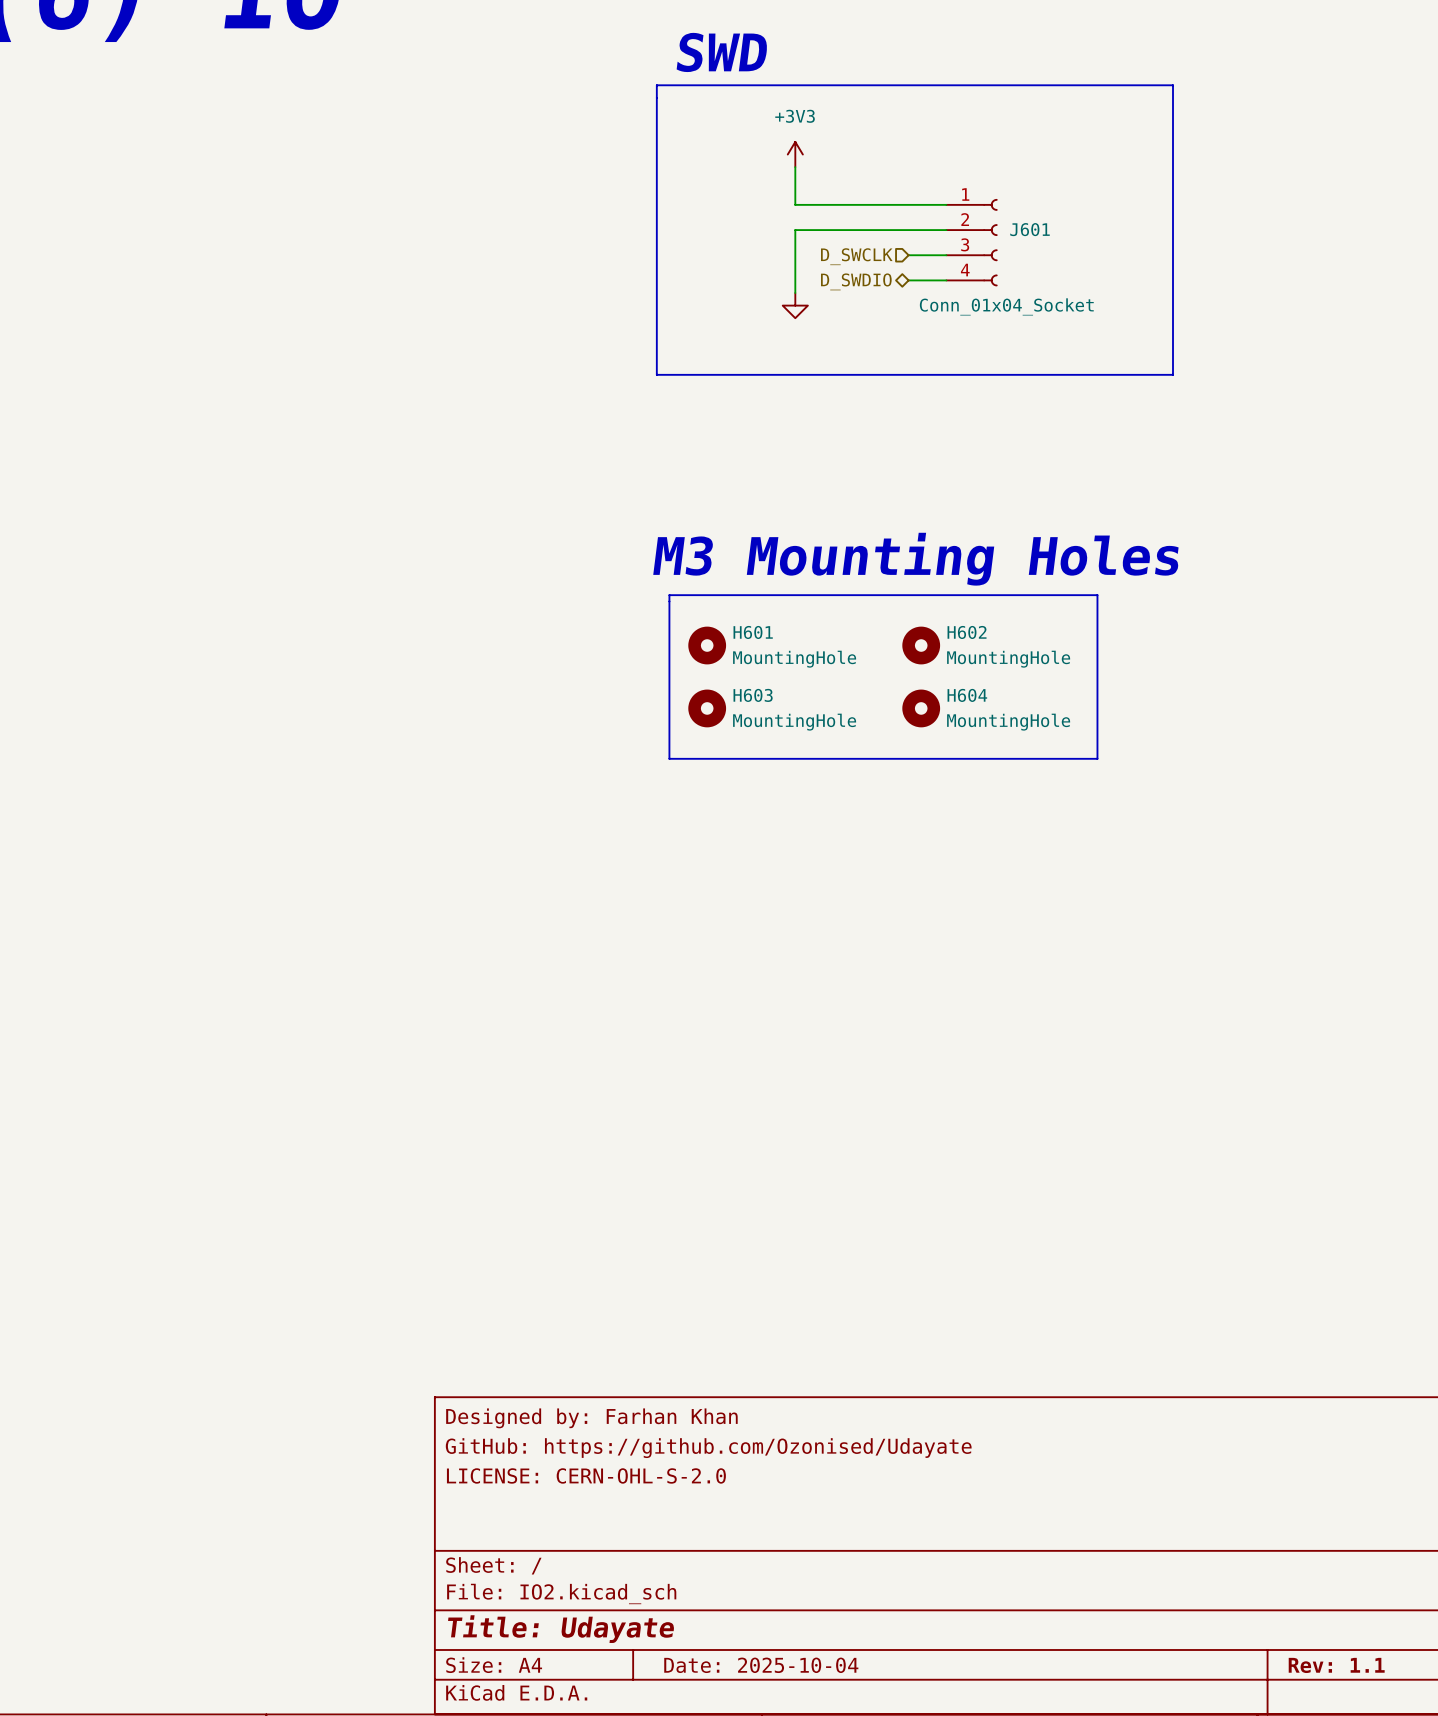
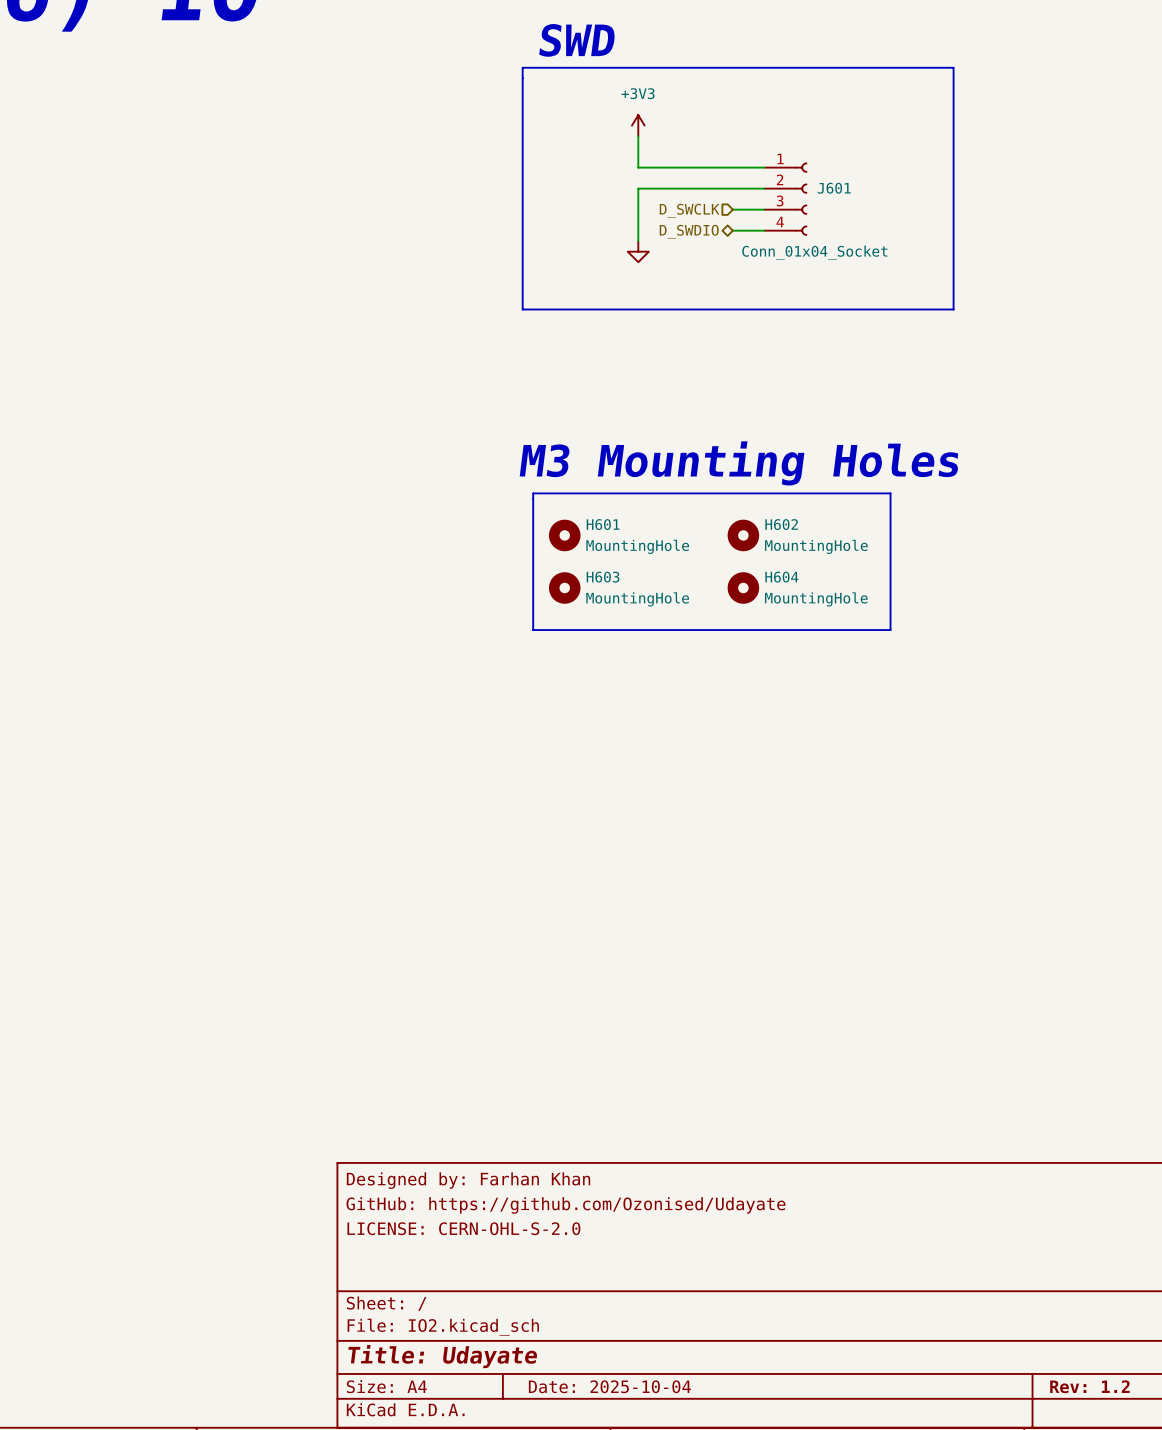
title block: Rev: 1.1 (1336, 1665) -> Rev: 1.2 (1089, 1386)

